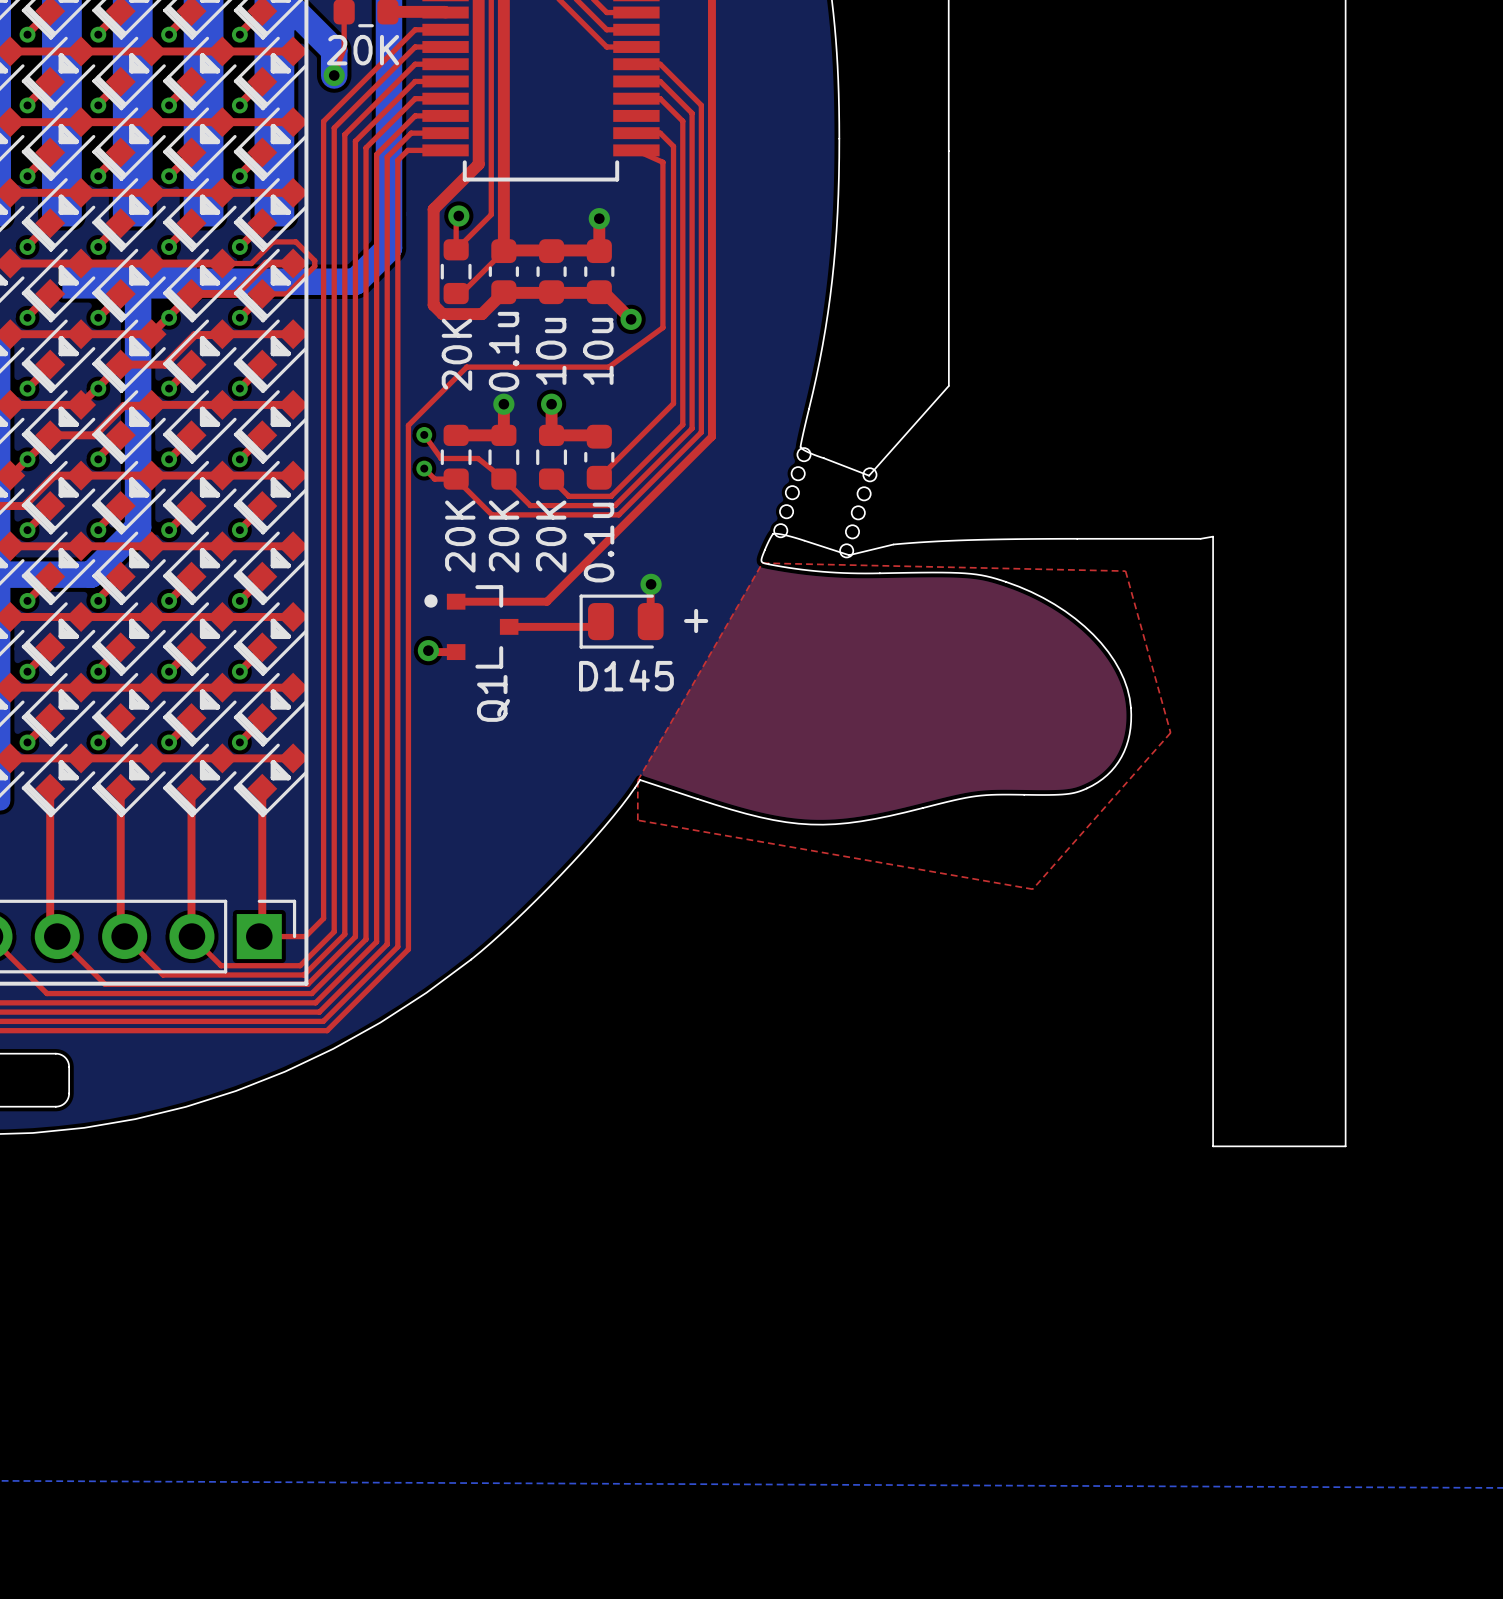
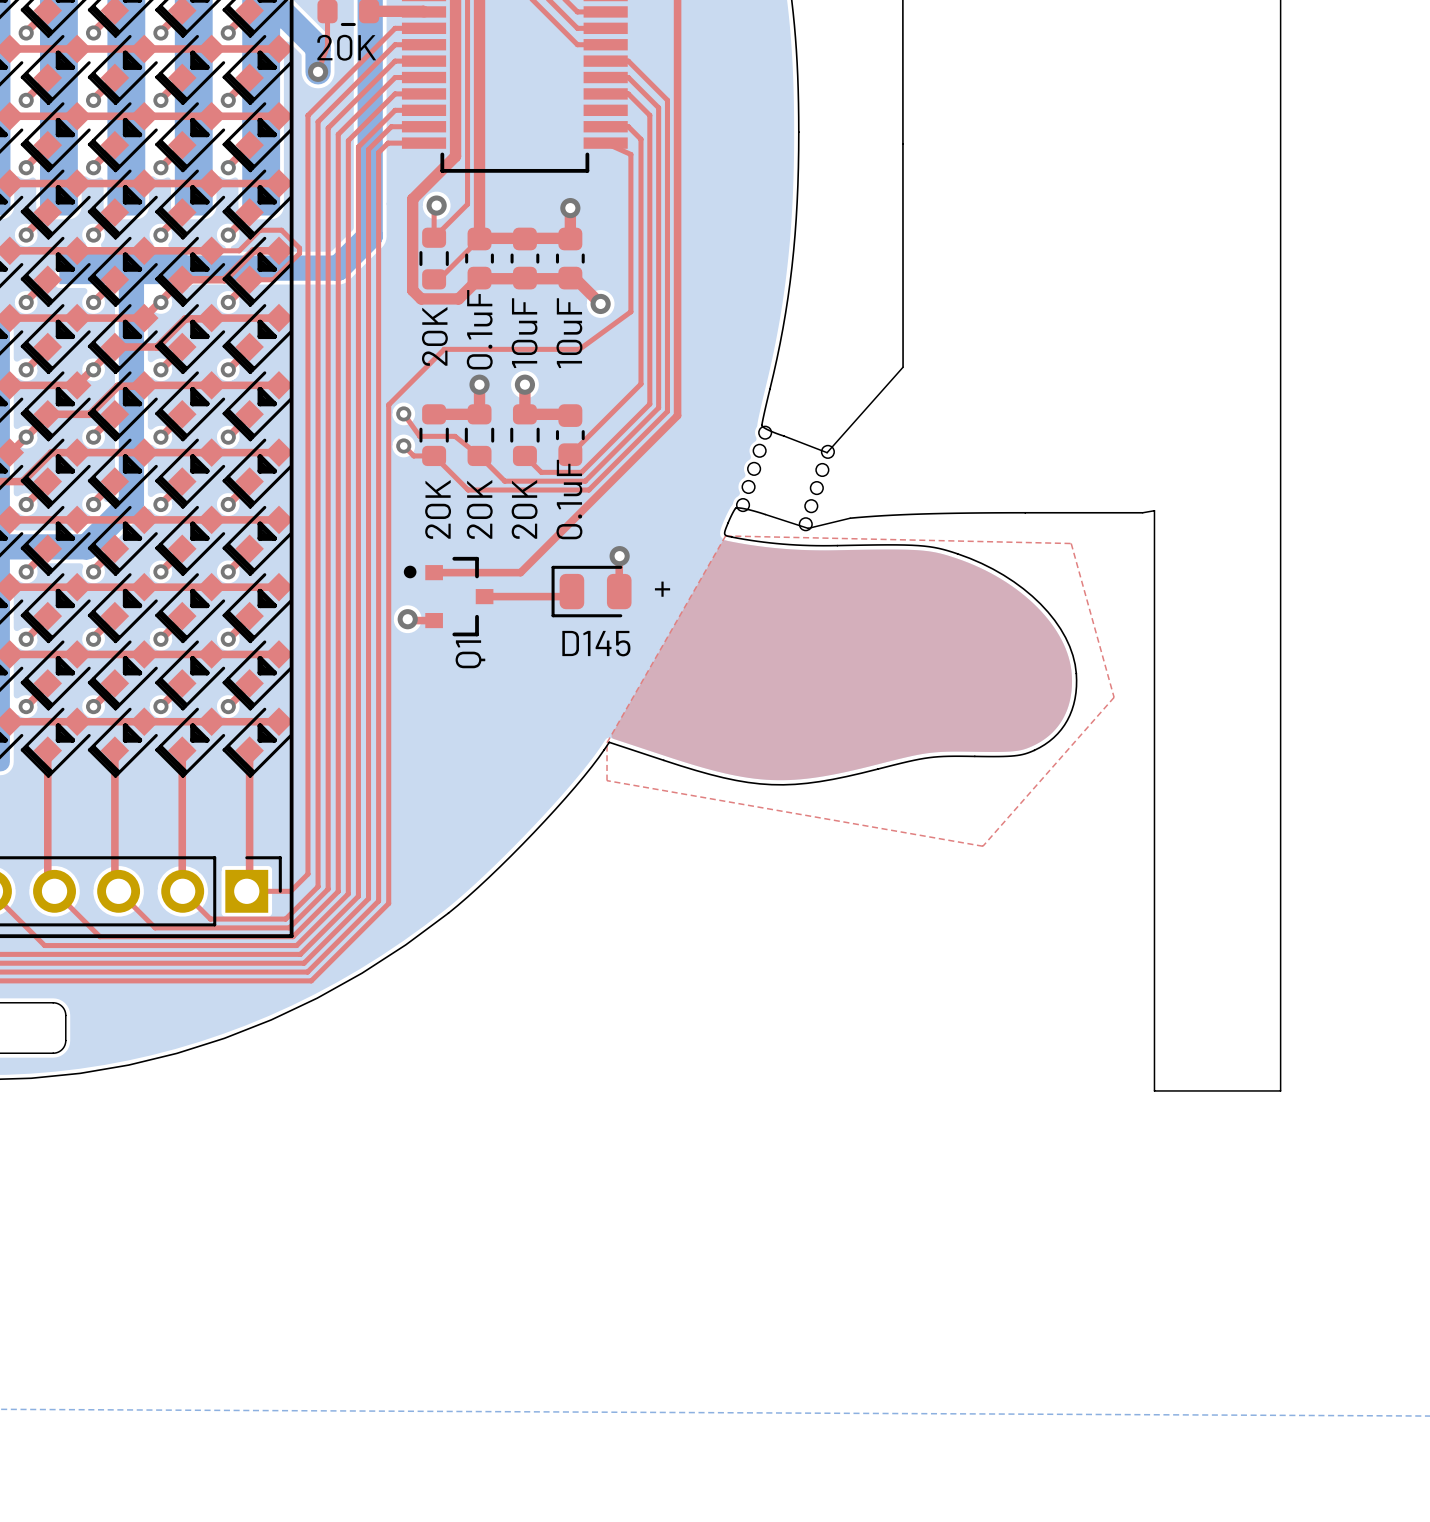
part value: 0.1u (504, 351) -> 0.1uF (479, 329)
part value: 10u (551, 351) -> 10uF (524, 333)
part value: 10u (598, 351) -> 10uF (569, 333)
part value: 0.1u (599, 542) -> 0.1uF (569, 499)

